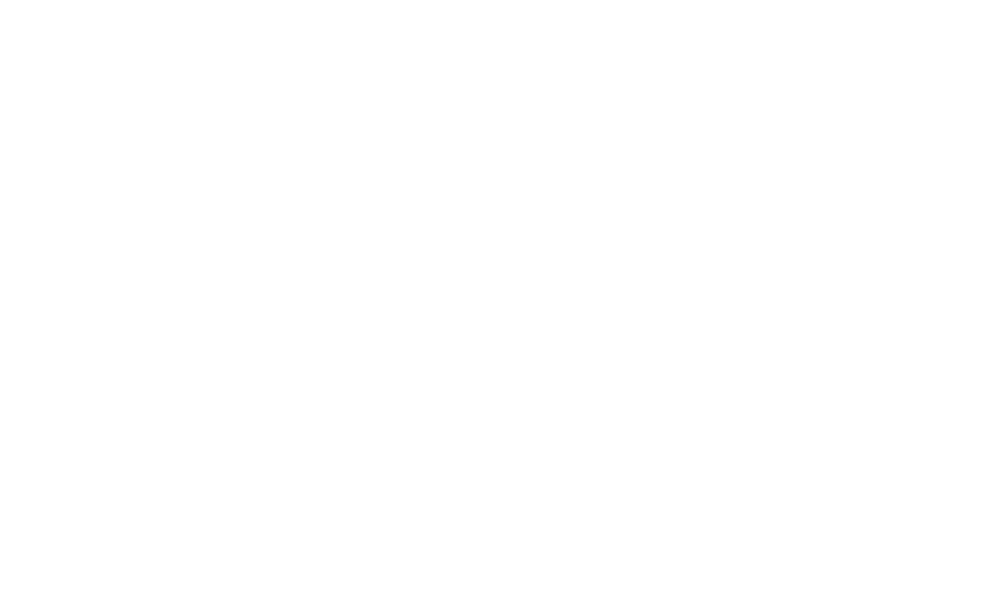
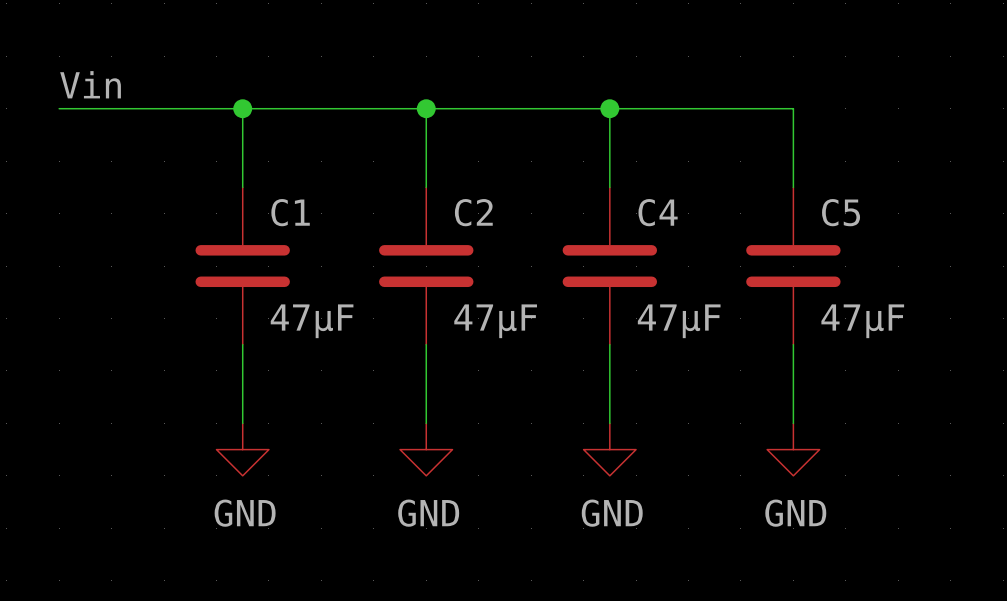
label: none -> Vin (90, 84)
wire: none -> (59, 108) (793, 108) (793, 187)
wire: none -> (242, 108) (242, 187)
junction: none -> (242, 108)
wire: none -> (426, 108) (426, 187)
junction: none -> (426, 108)
wire: none -> (609, 108) (609, 187)
junction: none -> (609, 108)
C1: none -> 47µF (242, 266)
C2: none -> 47µF (426, 266)
C4: none -> 47µF (609, 266)
C5: none -> 47µF (793, 266)
wire: none -> (242, 344) (242, 423)
wire: none -> (426, 344) (426, 423)
wire: none -> (609, 344) (609, 423)
wire: none -> (793, 344) (793, 423)
power symbol: none -> GND (242, 449)
power symbol: none -> GND (426, 449)
power symbol: none -> GND (609, 449)
power symbol: none -> GND (793, 449)

